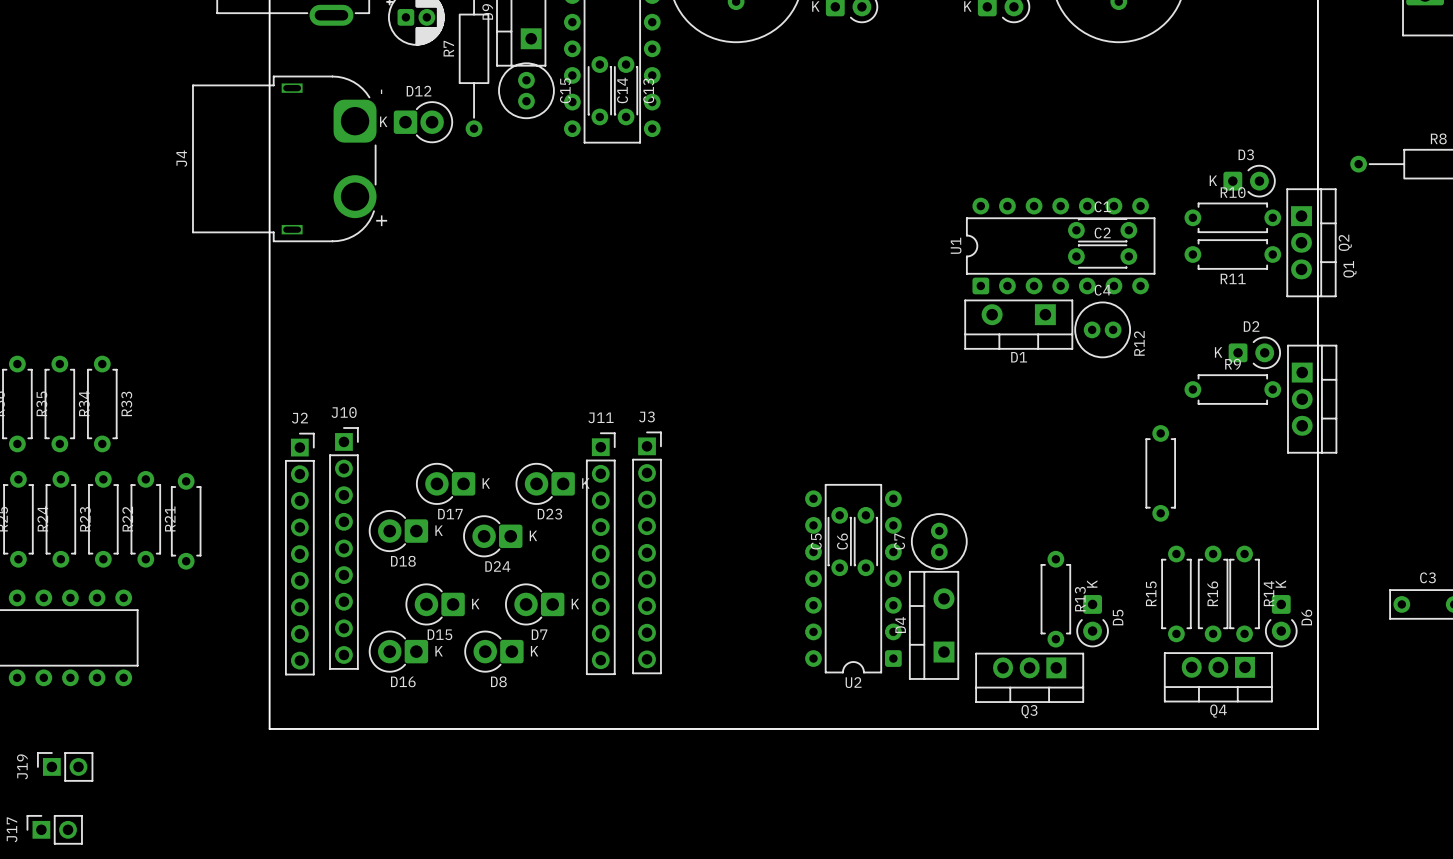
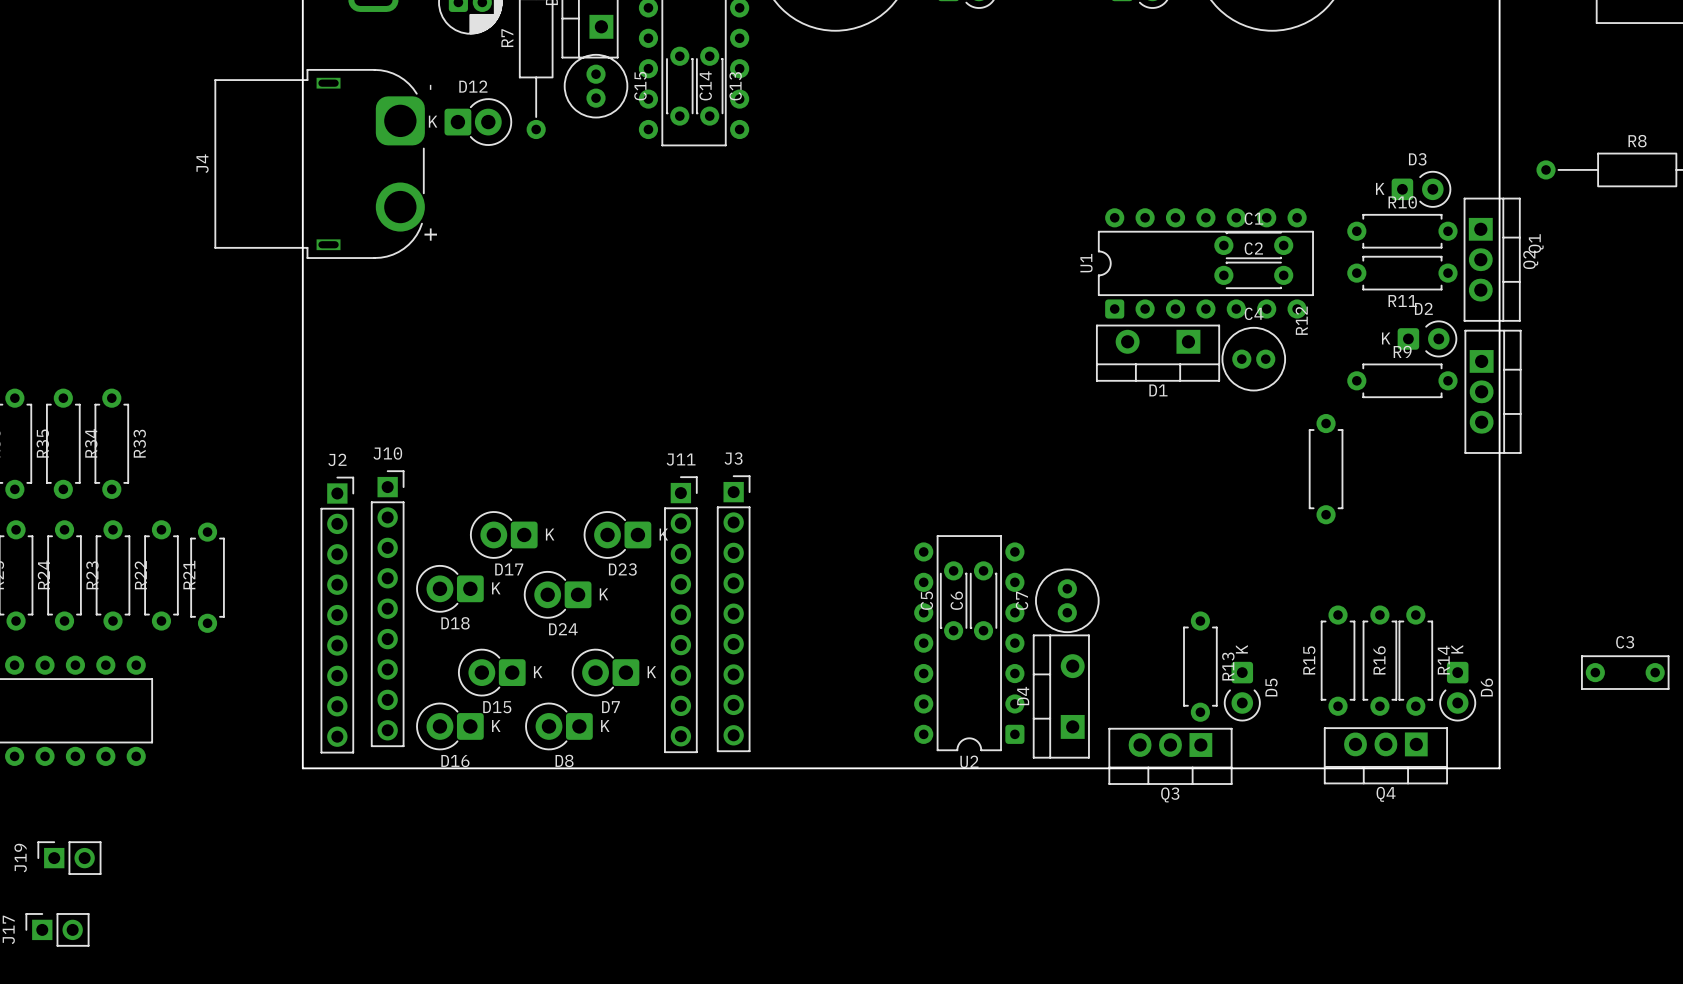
D2 position: (1254, 352) -> (1427, 338)
R9 position: (1232, 389) -> (1402, 380)
Q1 position: (1312, 399) -> (1493, 391)
R12 position: (1160, 473) -> (1326, 469)
board edge: (269, 688) (269, 728) (1317, 728) (1317, 688) -> (302, 768) (1499, 768)

